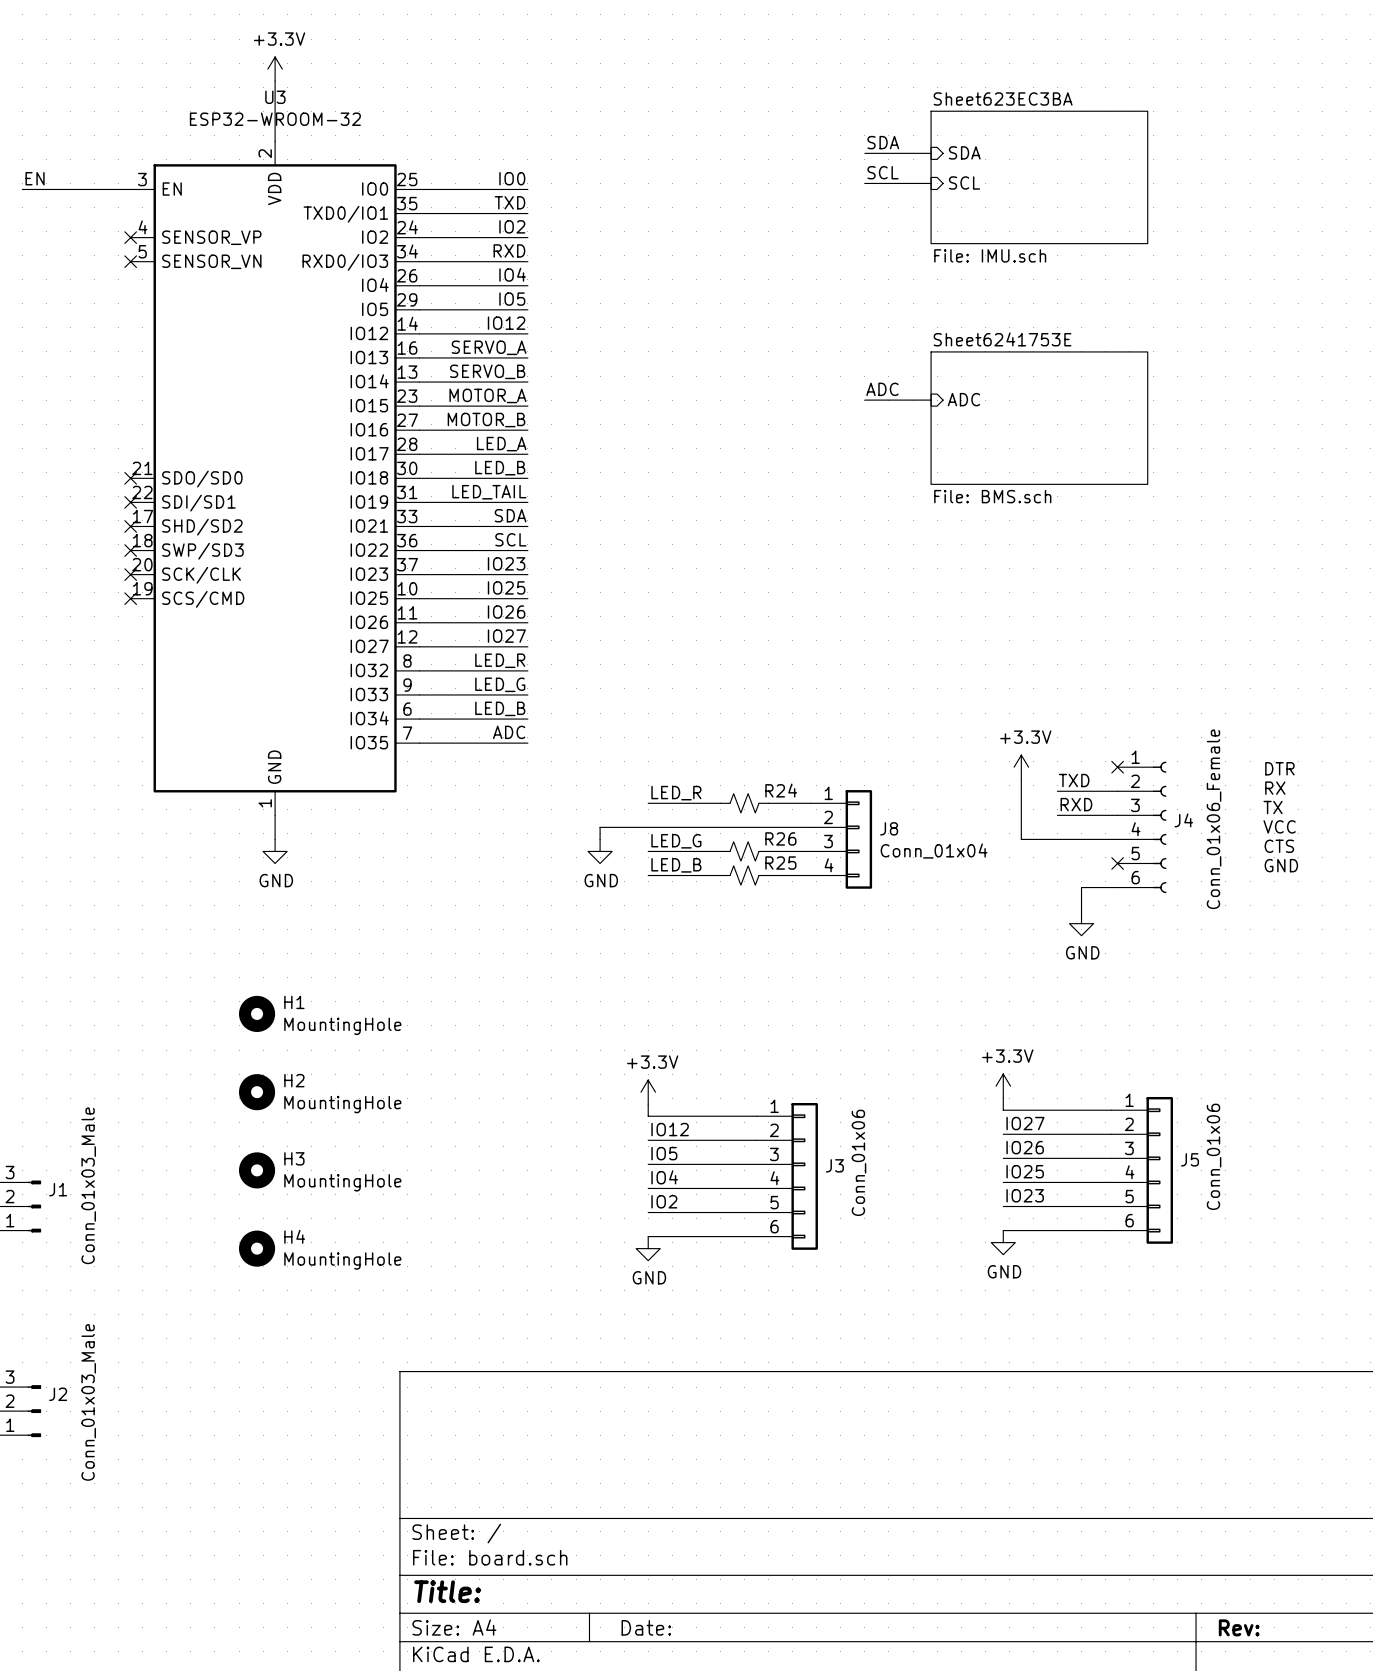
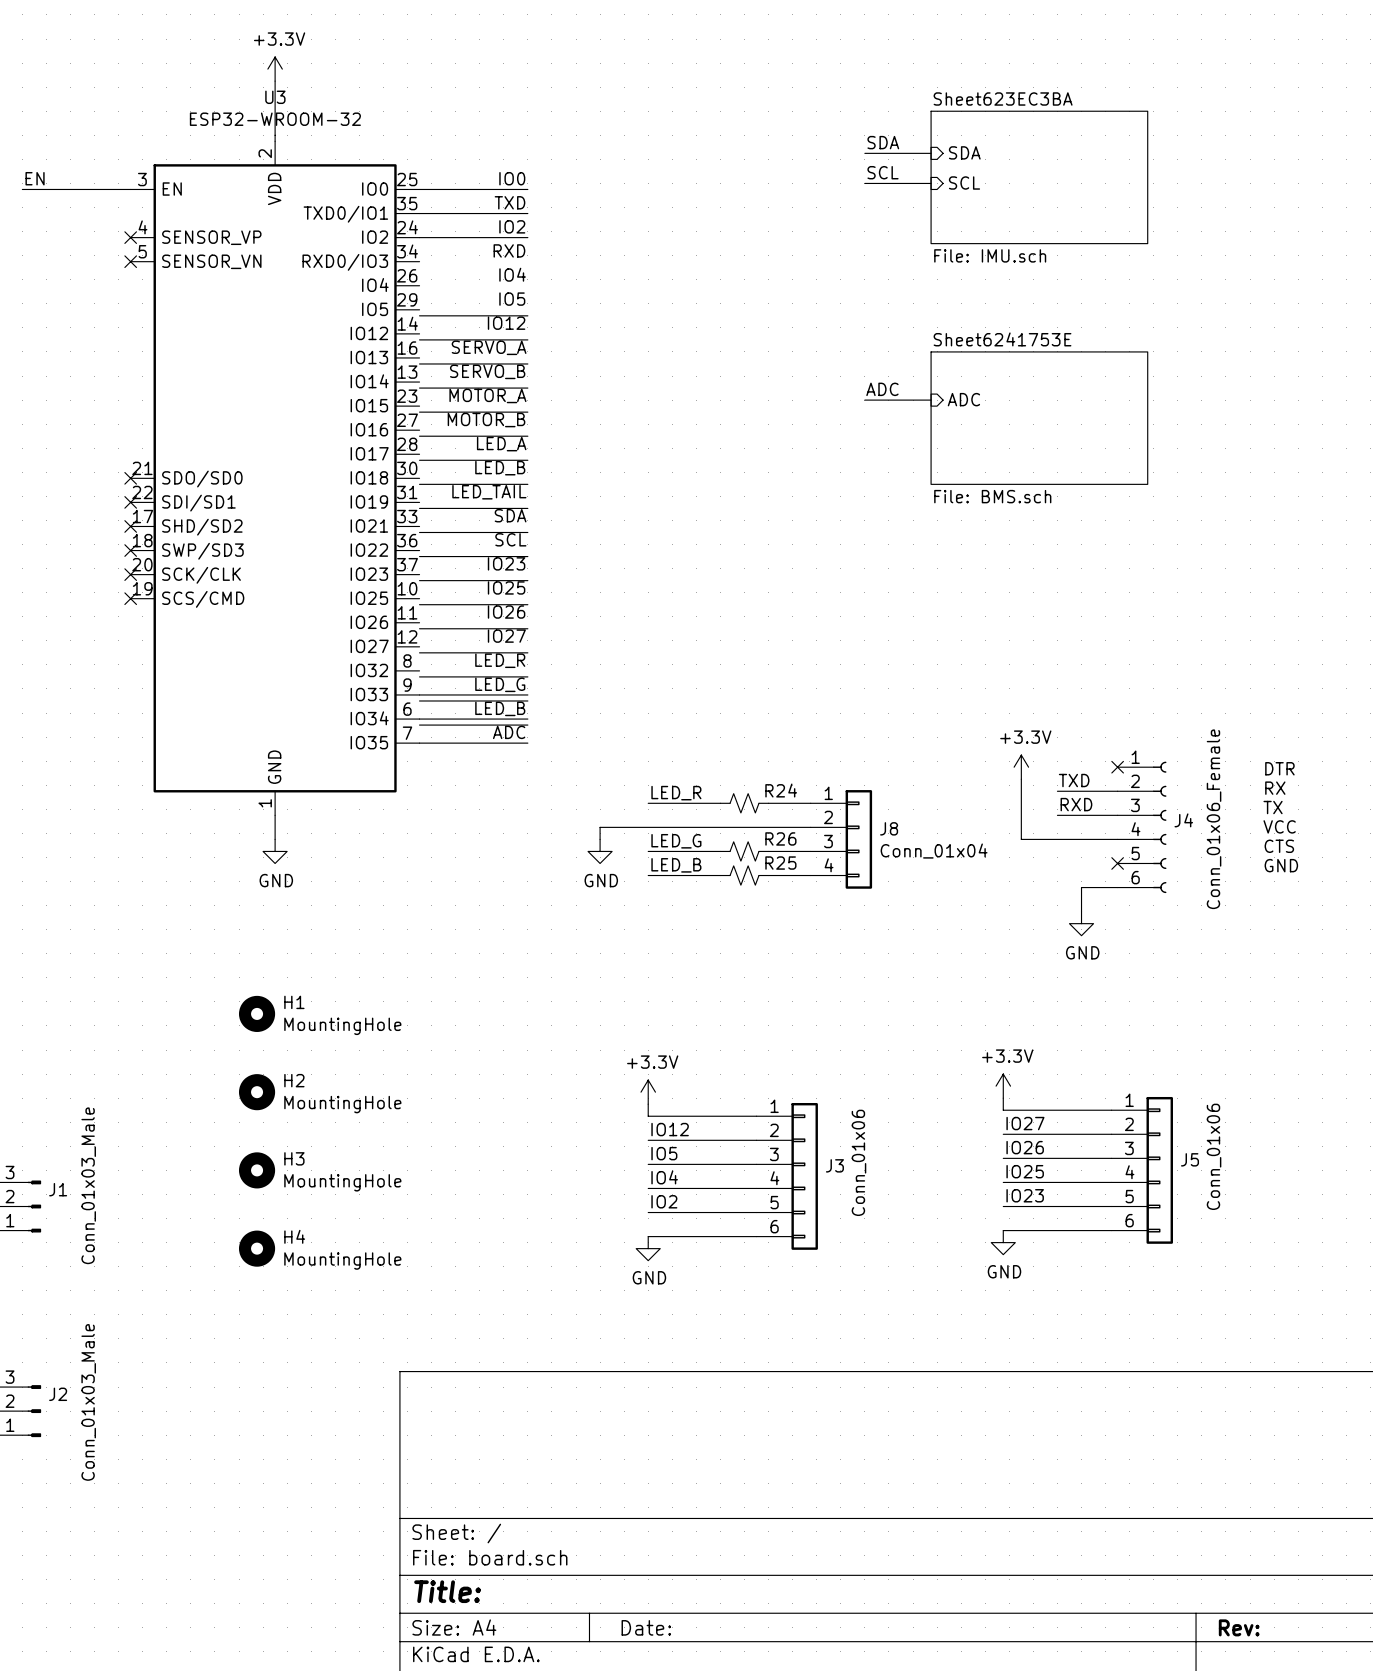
wire: (419, 261) (527, 261) -> (419, 315) (527, 315)
wire: (419, 285) (527, 285) -> (419, 339) (527, 339)
wire: (419, 309) (527, 309) -> (419, 363) (527, 363)
wire: (419, 333) (527, 333) -> (419, 388) (527, 388)
wire: (419, 357) (527, 357) -> (419, 412) (527, 412)
wire: (419, 382) (527, 382) -> (419, 436) (527, 436)
wire: (419, 406) (527, 406) -> (419, 460) (527, 460)
wire: (419, 430) (527, 430) -> (419, 484) (527, 484)
wire: (419, 454) (527, 454) -> (419, 508) (527, 508)
wire: (419, 478) (527, 478) -> (419, 532) (527, 532)
wire: (419, 502) (527, 502) -> (419, 556) (527, 556)
wire: (419, 526) (527, 526) -> (419, 580) (527, 580)
wire: (419, 550) (527, 550) -> (419, 604) (527, 604)
wire: (419, 574) (527, 574) -> (419, 628) (527, 628)
wire: (419, 598) (527, 598) -> (419, 652) (527, 652)
wire: (419, 622) (527, 622) -> (419, 676) (527, 676)
wire: (419, 646) (527, 646) -> (419, 700) (527, 700)
wire: (419, 670) (527, 670) -> (419, 725) (527, 725)

